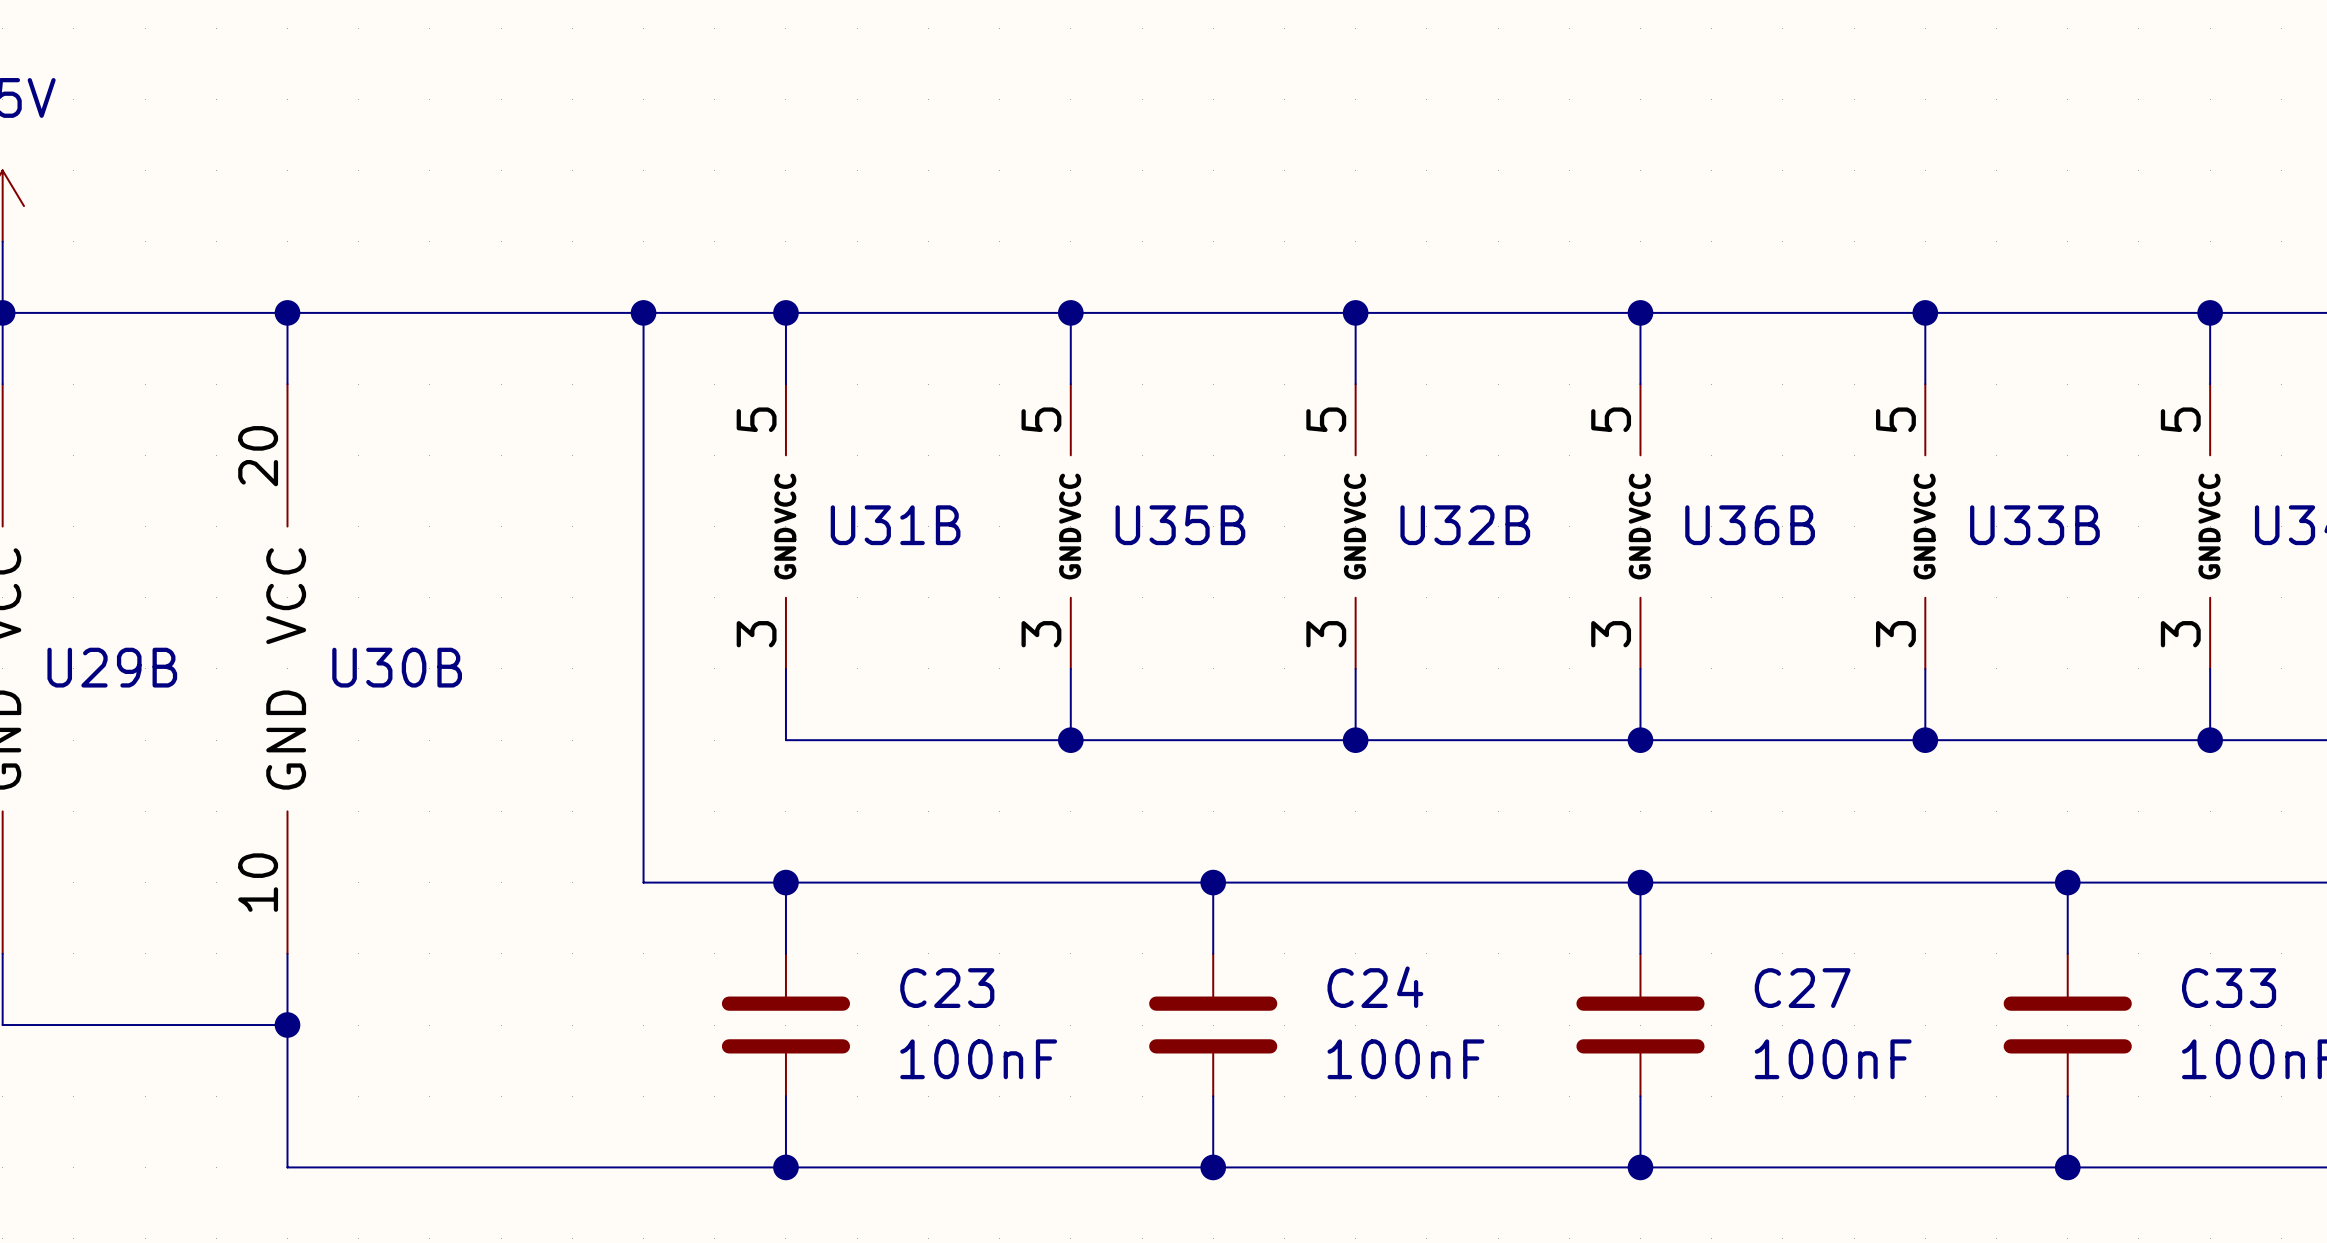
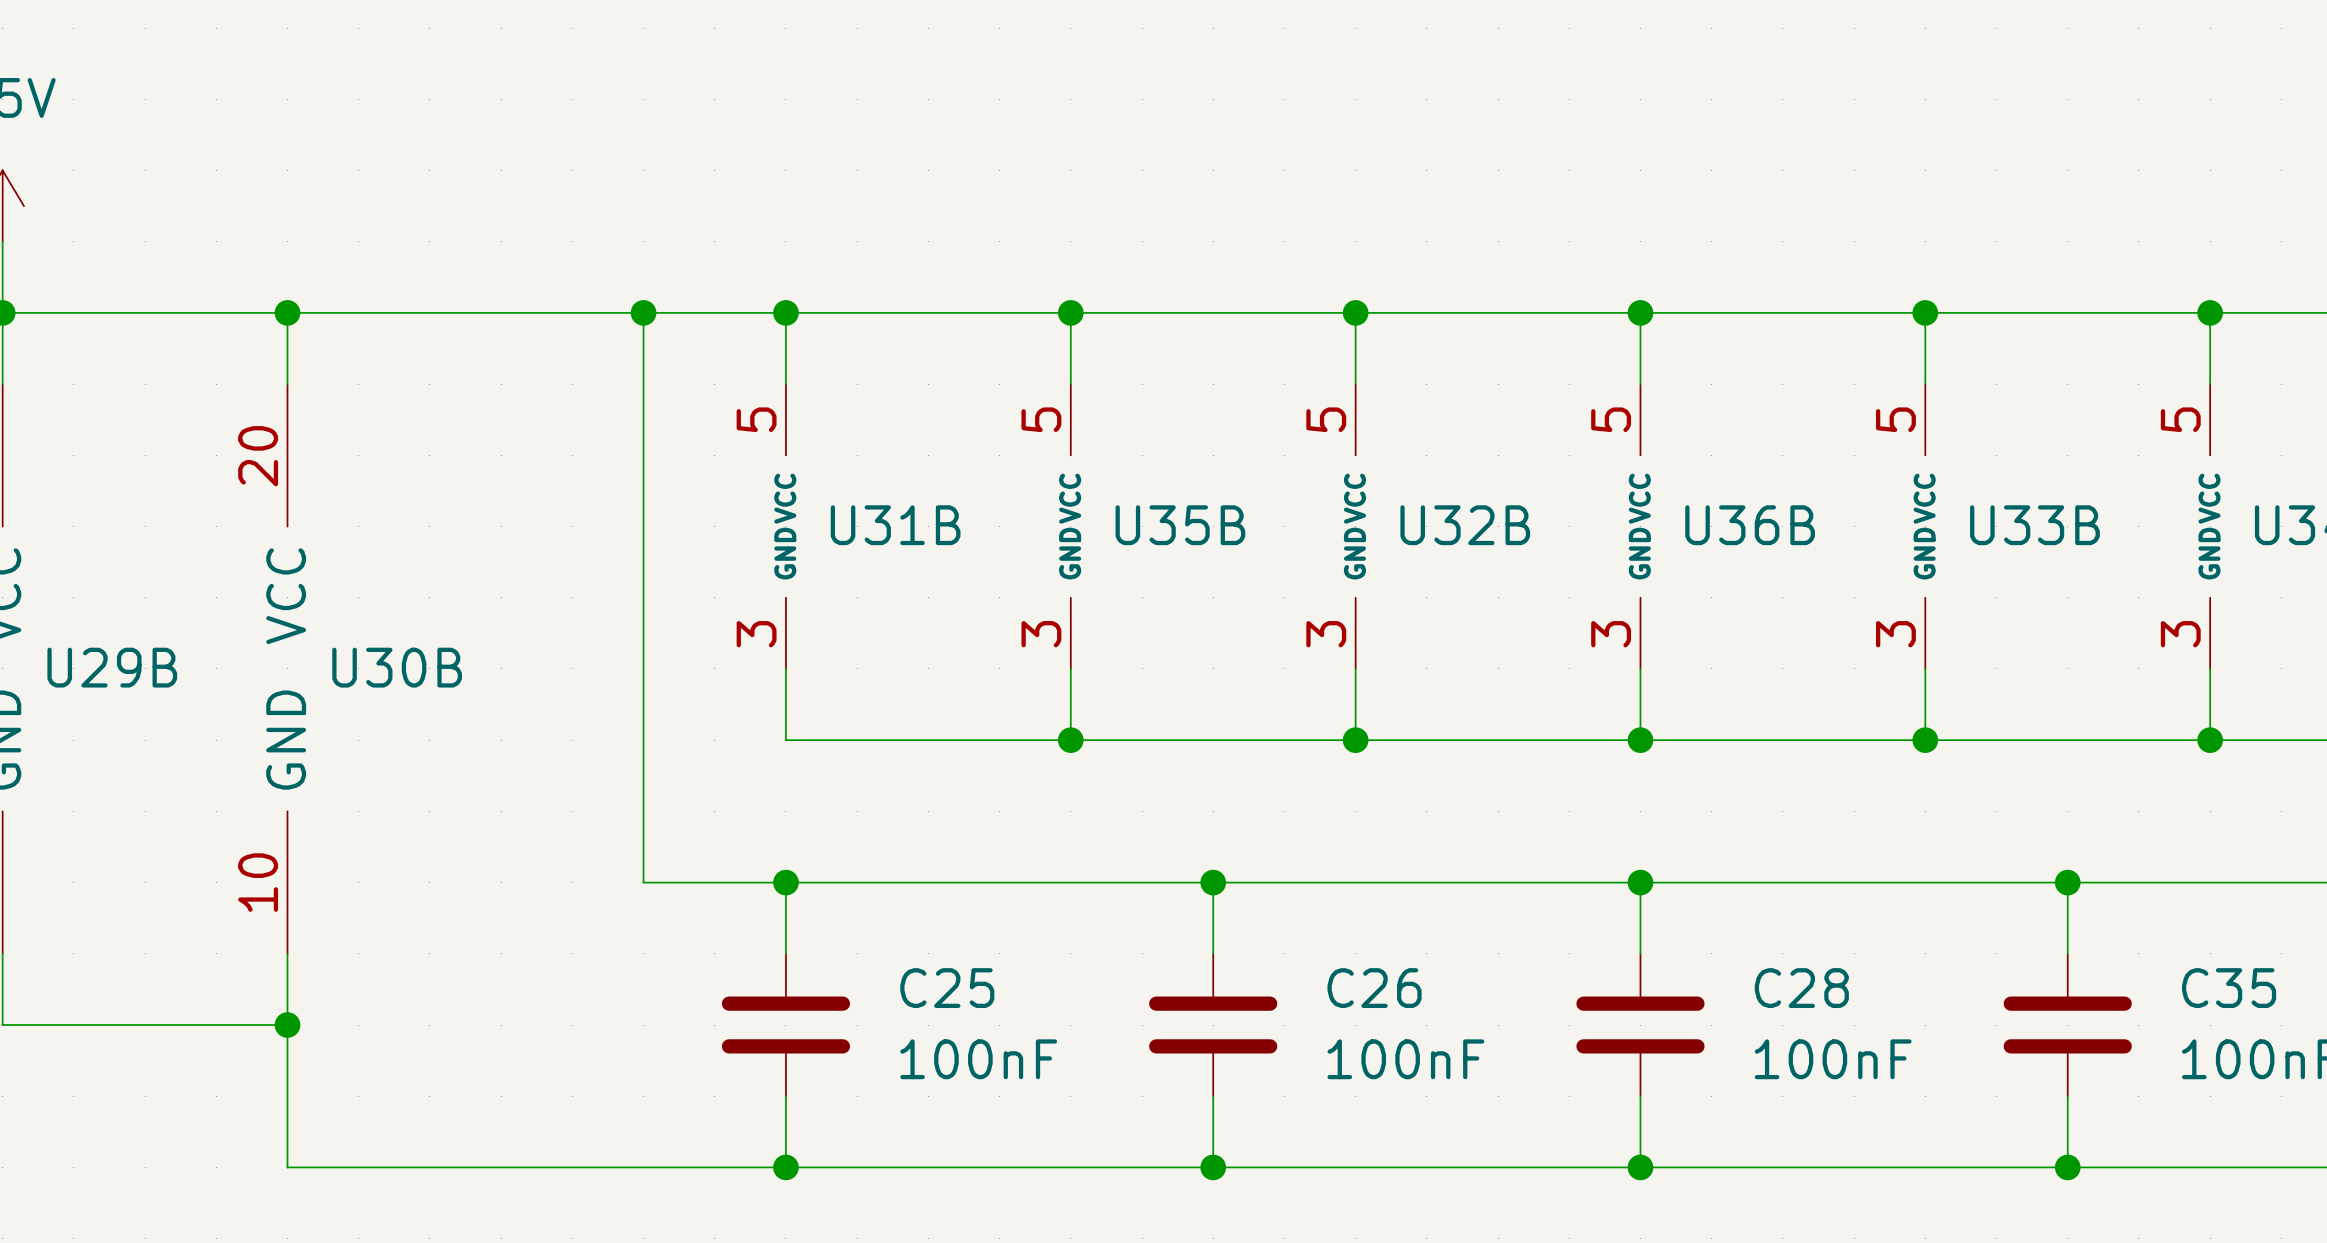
C24 name: C24 (1375, 987) -> C26 (1374, 988)
C23 name: C23 (947, 988) -> C25 (947, 988)
C27 name: C27 (1802, 988) -> C28 (1801, 988)
C33 name: C33 (2229, 988) -> C35 (2229, 988)

